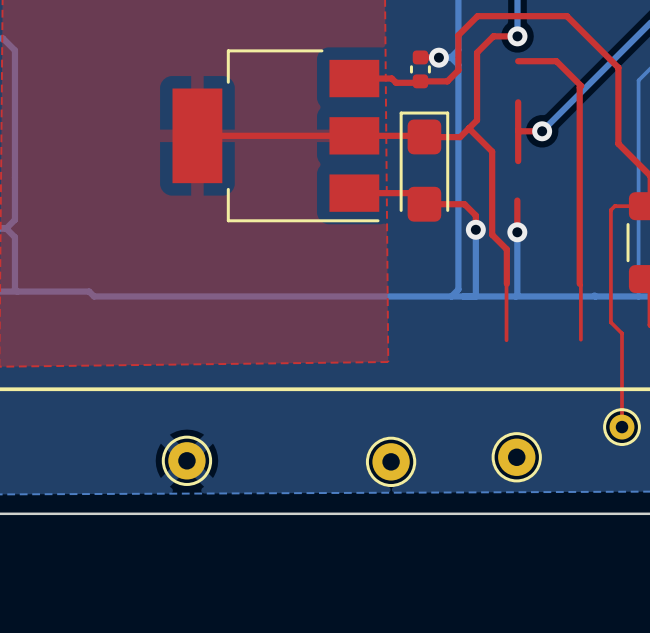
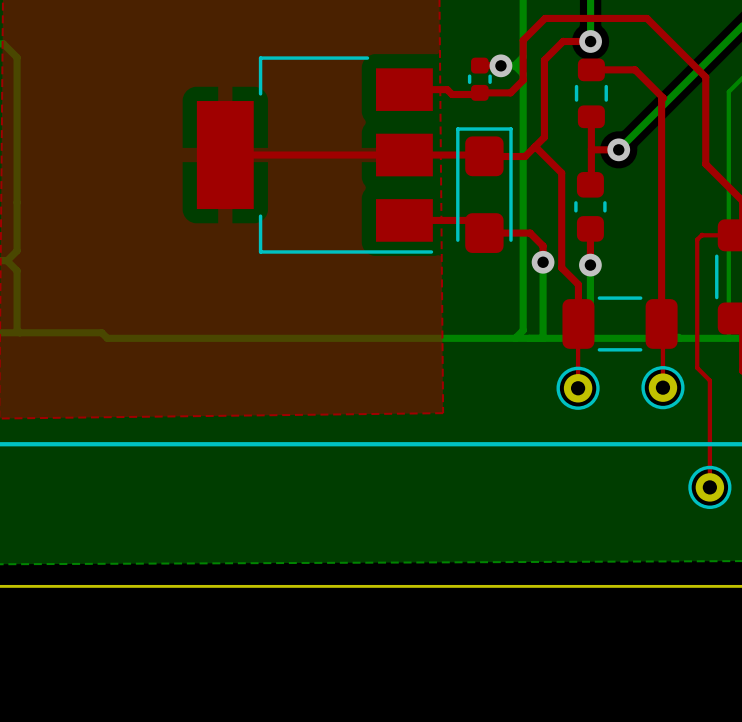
part: none -> (591, 93)
part: none -> (590, 206)
part: none -> (620, 323)
part: none -> (662, 387)
part: none -> (578, 388)
part: (516, 457) -> none
part: (186, 460) -> none
part: (391, 461) -> none

